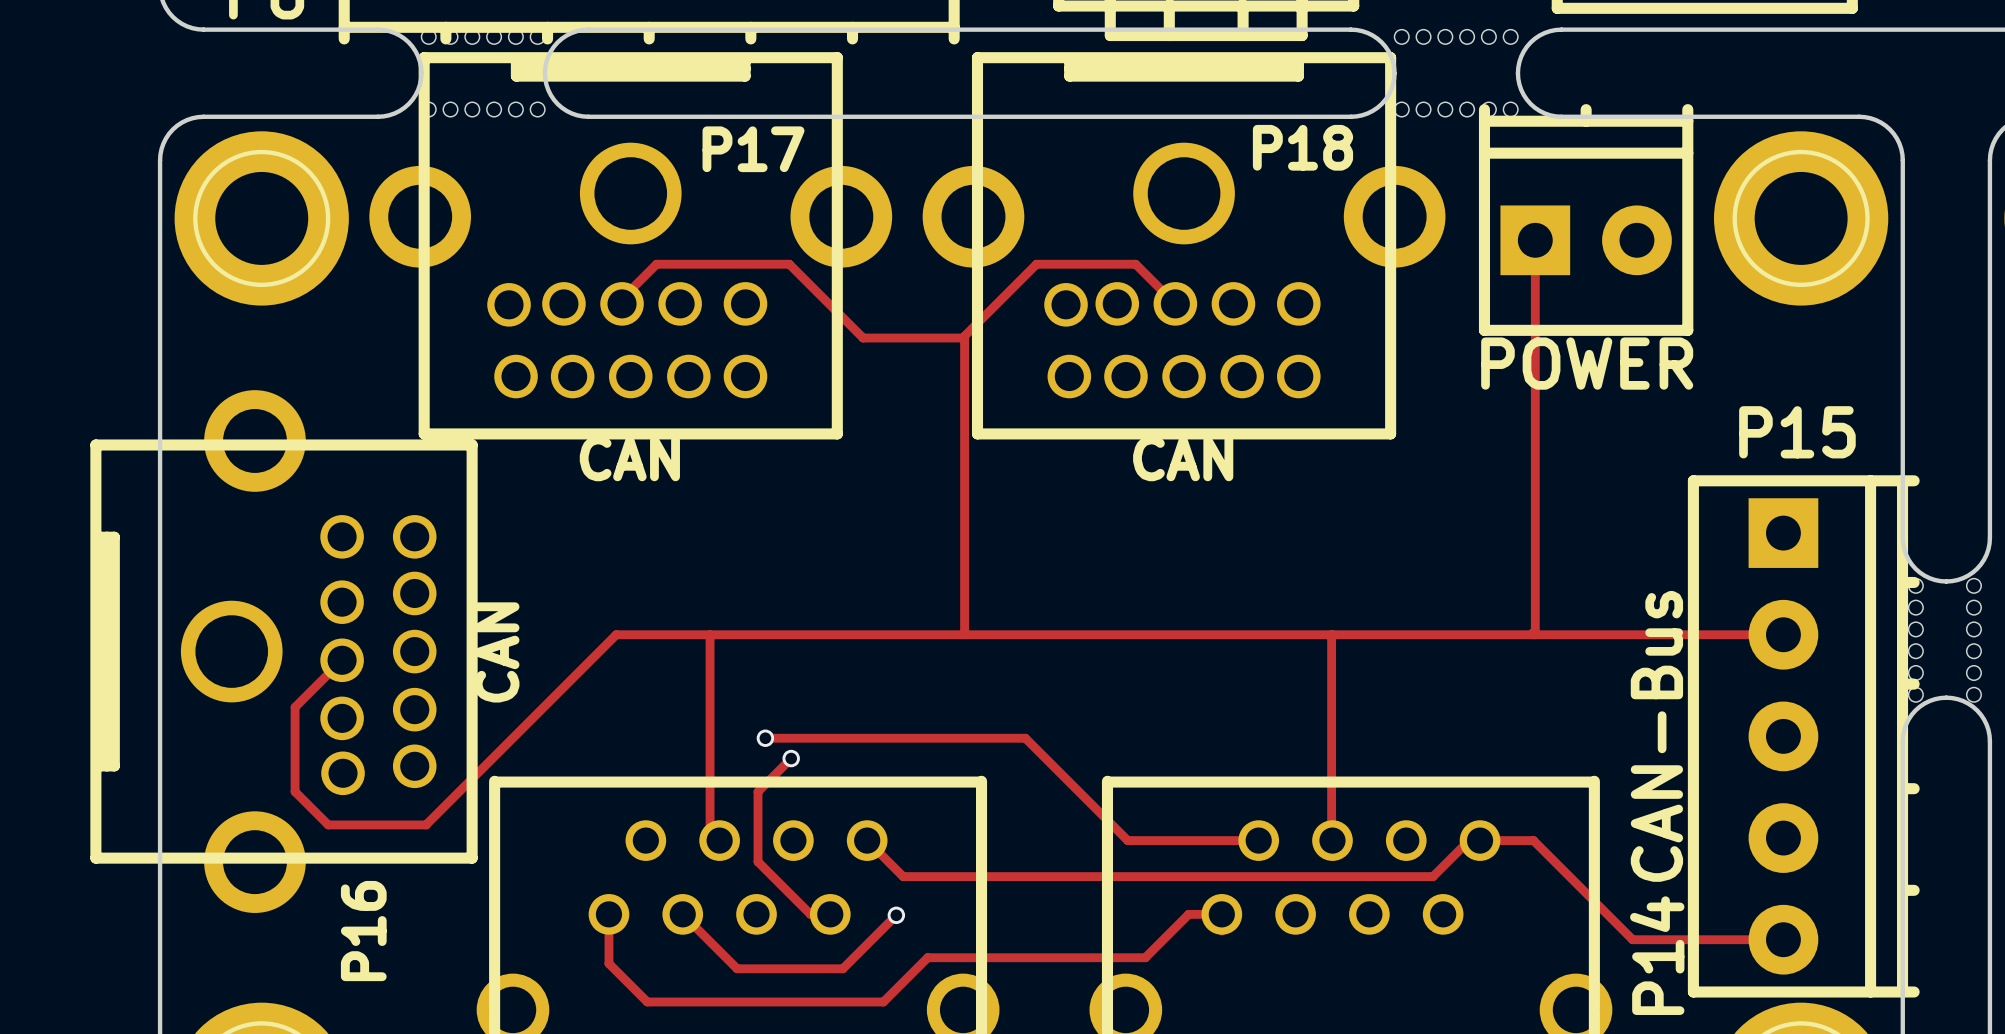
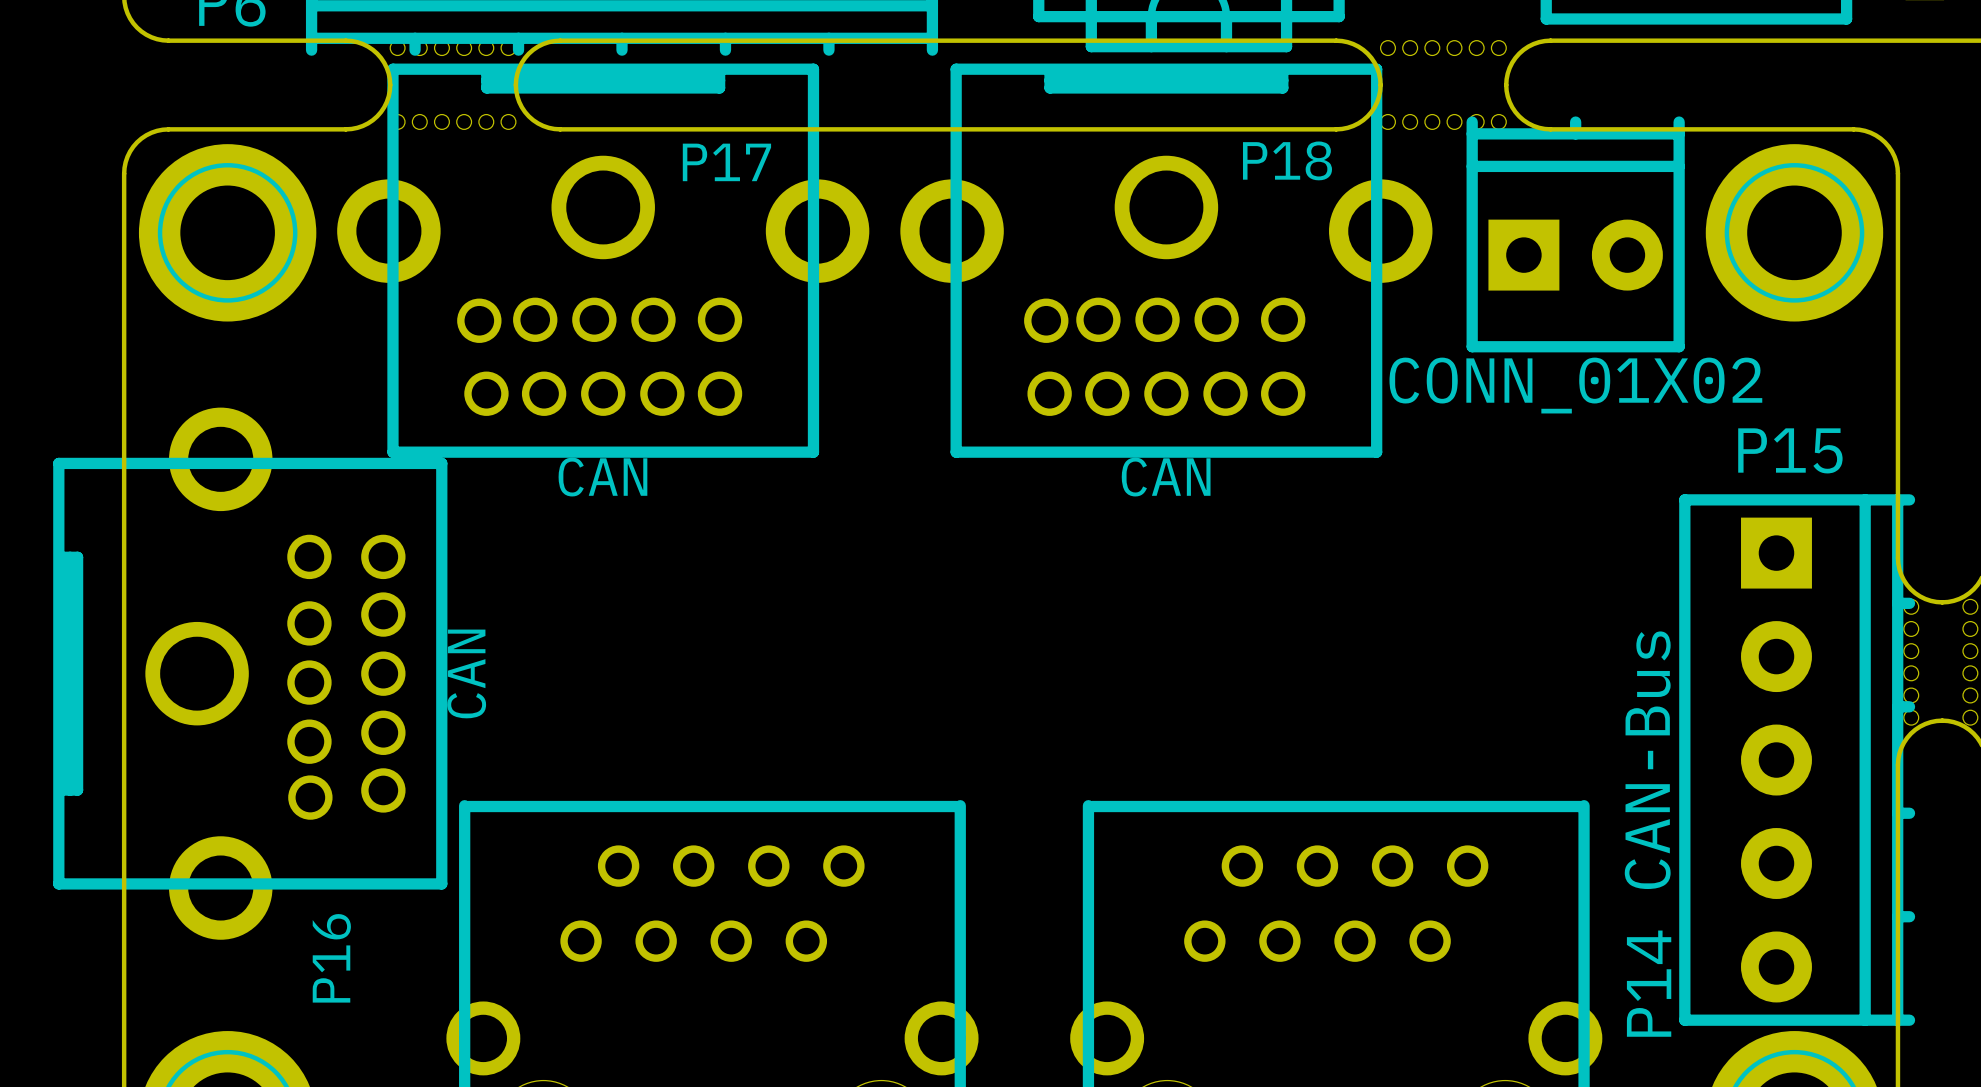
track: (1535, 240) (1535, 634) (1533, 633) (1532, 634) -> none
track: (622, 303) (622, 298) (656, 264) (789, 264) (863, 338) (964, 338) -> none
track: (1175, 303) (1135, 264) (1036, 264) (964, 336) (964, 634) -> none
P15 value: POWER (1587, 363) -> CONN_01X02 (1575, 385)
track: (710, 634) (710, 831) (719, 840) -> none
track: (1331, 634) (1332, 840) -> none
track: (1783, 634) (616, 634) (426, 824) (328, 824) (295, 791) (295, 707) (342, 660) -> none
track: (765, 738) (1025, 738) (1127, 840) (1258, 840) -> none
via: (765, 738) -> none
track: (791, 758) (758, 791) (758, 861) (810, 914) (830, 914) -> none
via: (791, 758) -> none
track: (867, 840) (903, 876) (1433, 876) (1469, 840) (1533, 840) (1632, 939) (1783, 939) -> none
track: (608, 914) (608, 963) (647, 1001) (883, 1001) (927, 957) (1145, 957) (1188, 914) (1221, 914) (1221, 931) -> none
track: (682, 914) (737, 968) (842, 968) (896, 915) -> none
via: (896, 915) -> none

